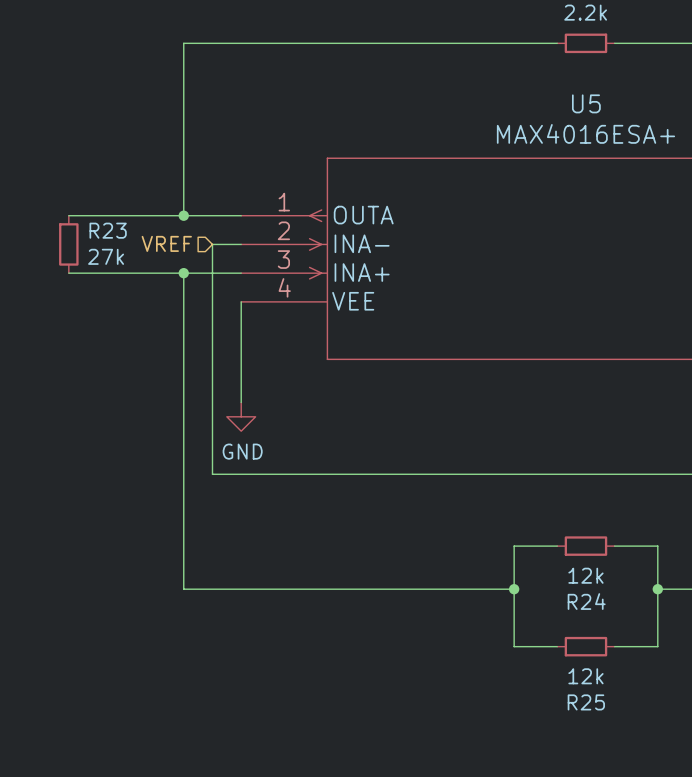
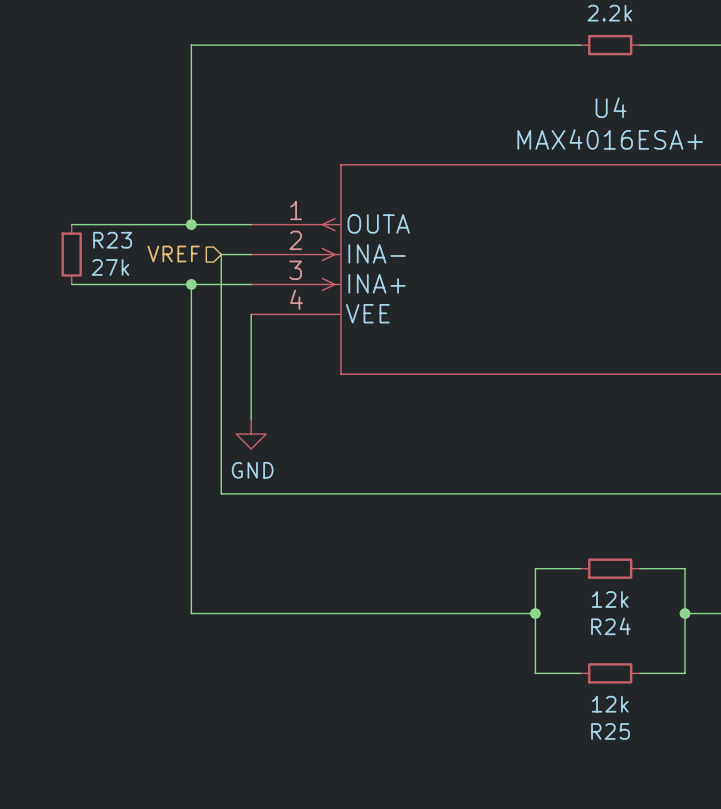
U5 name: U5 (586, 103) -> U4 (611, 107)

